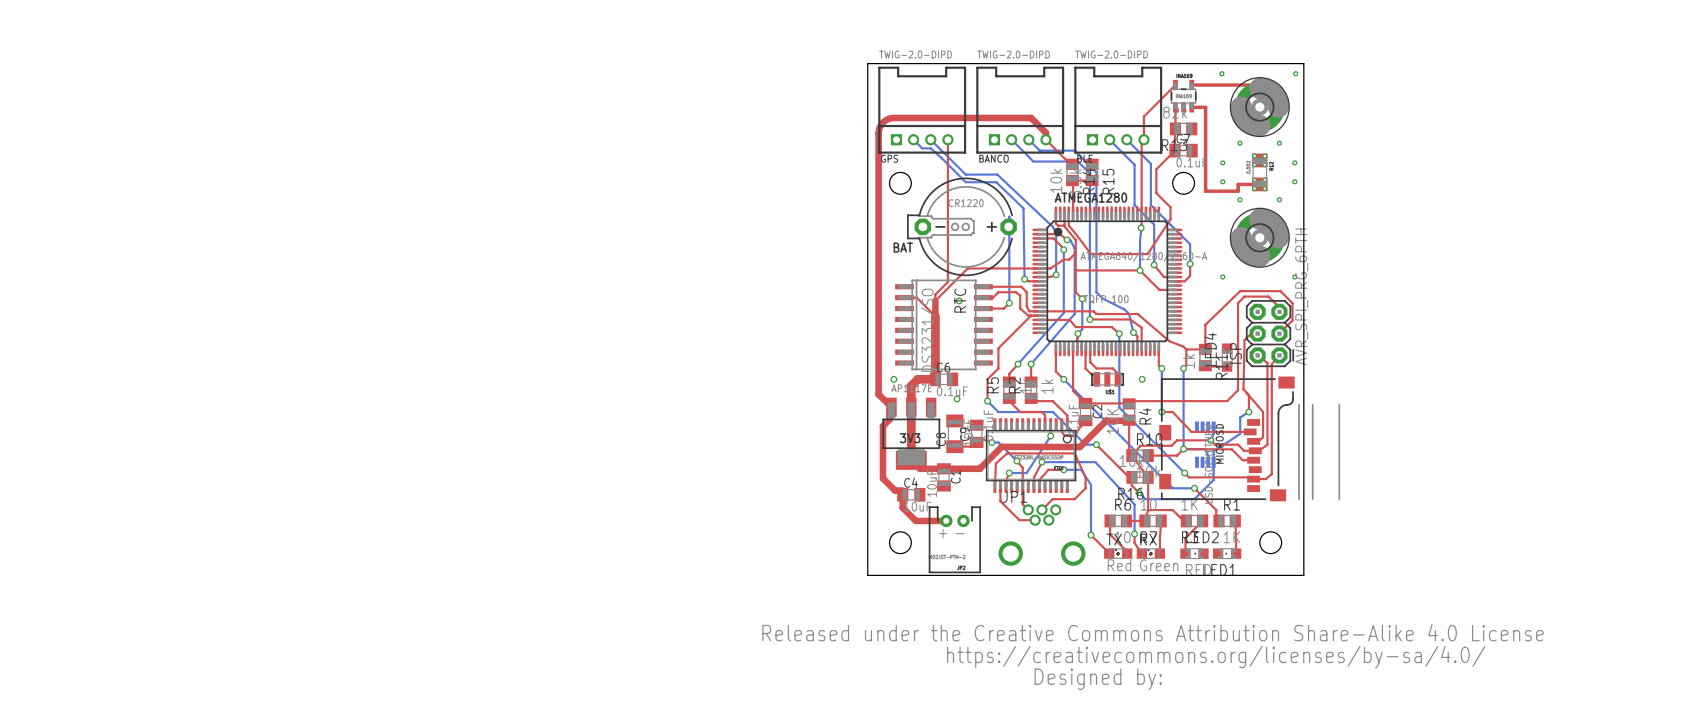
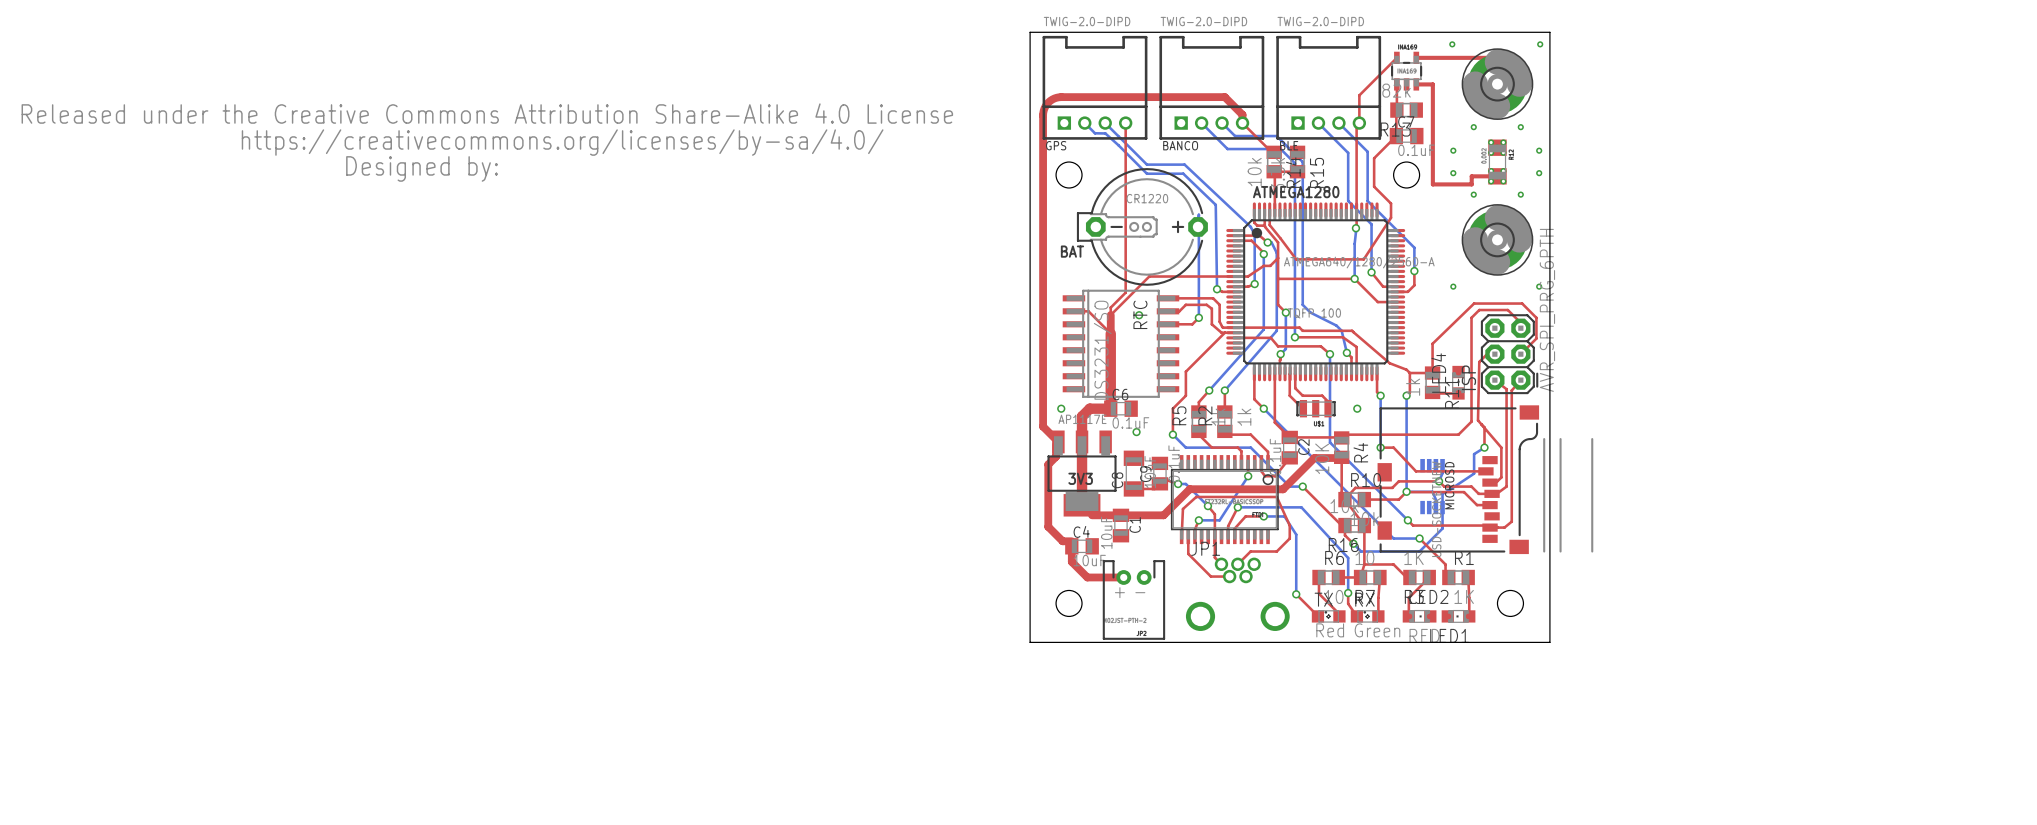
drawing: none -> [21, 103, 954, 182]
drawing: [762, 624, 1544, 691] -> none

